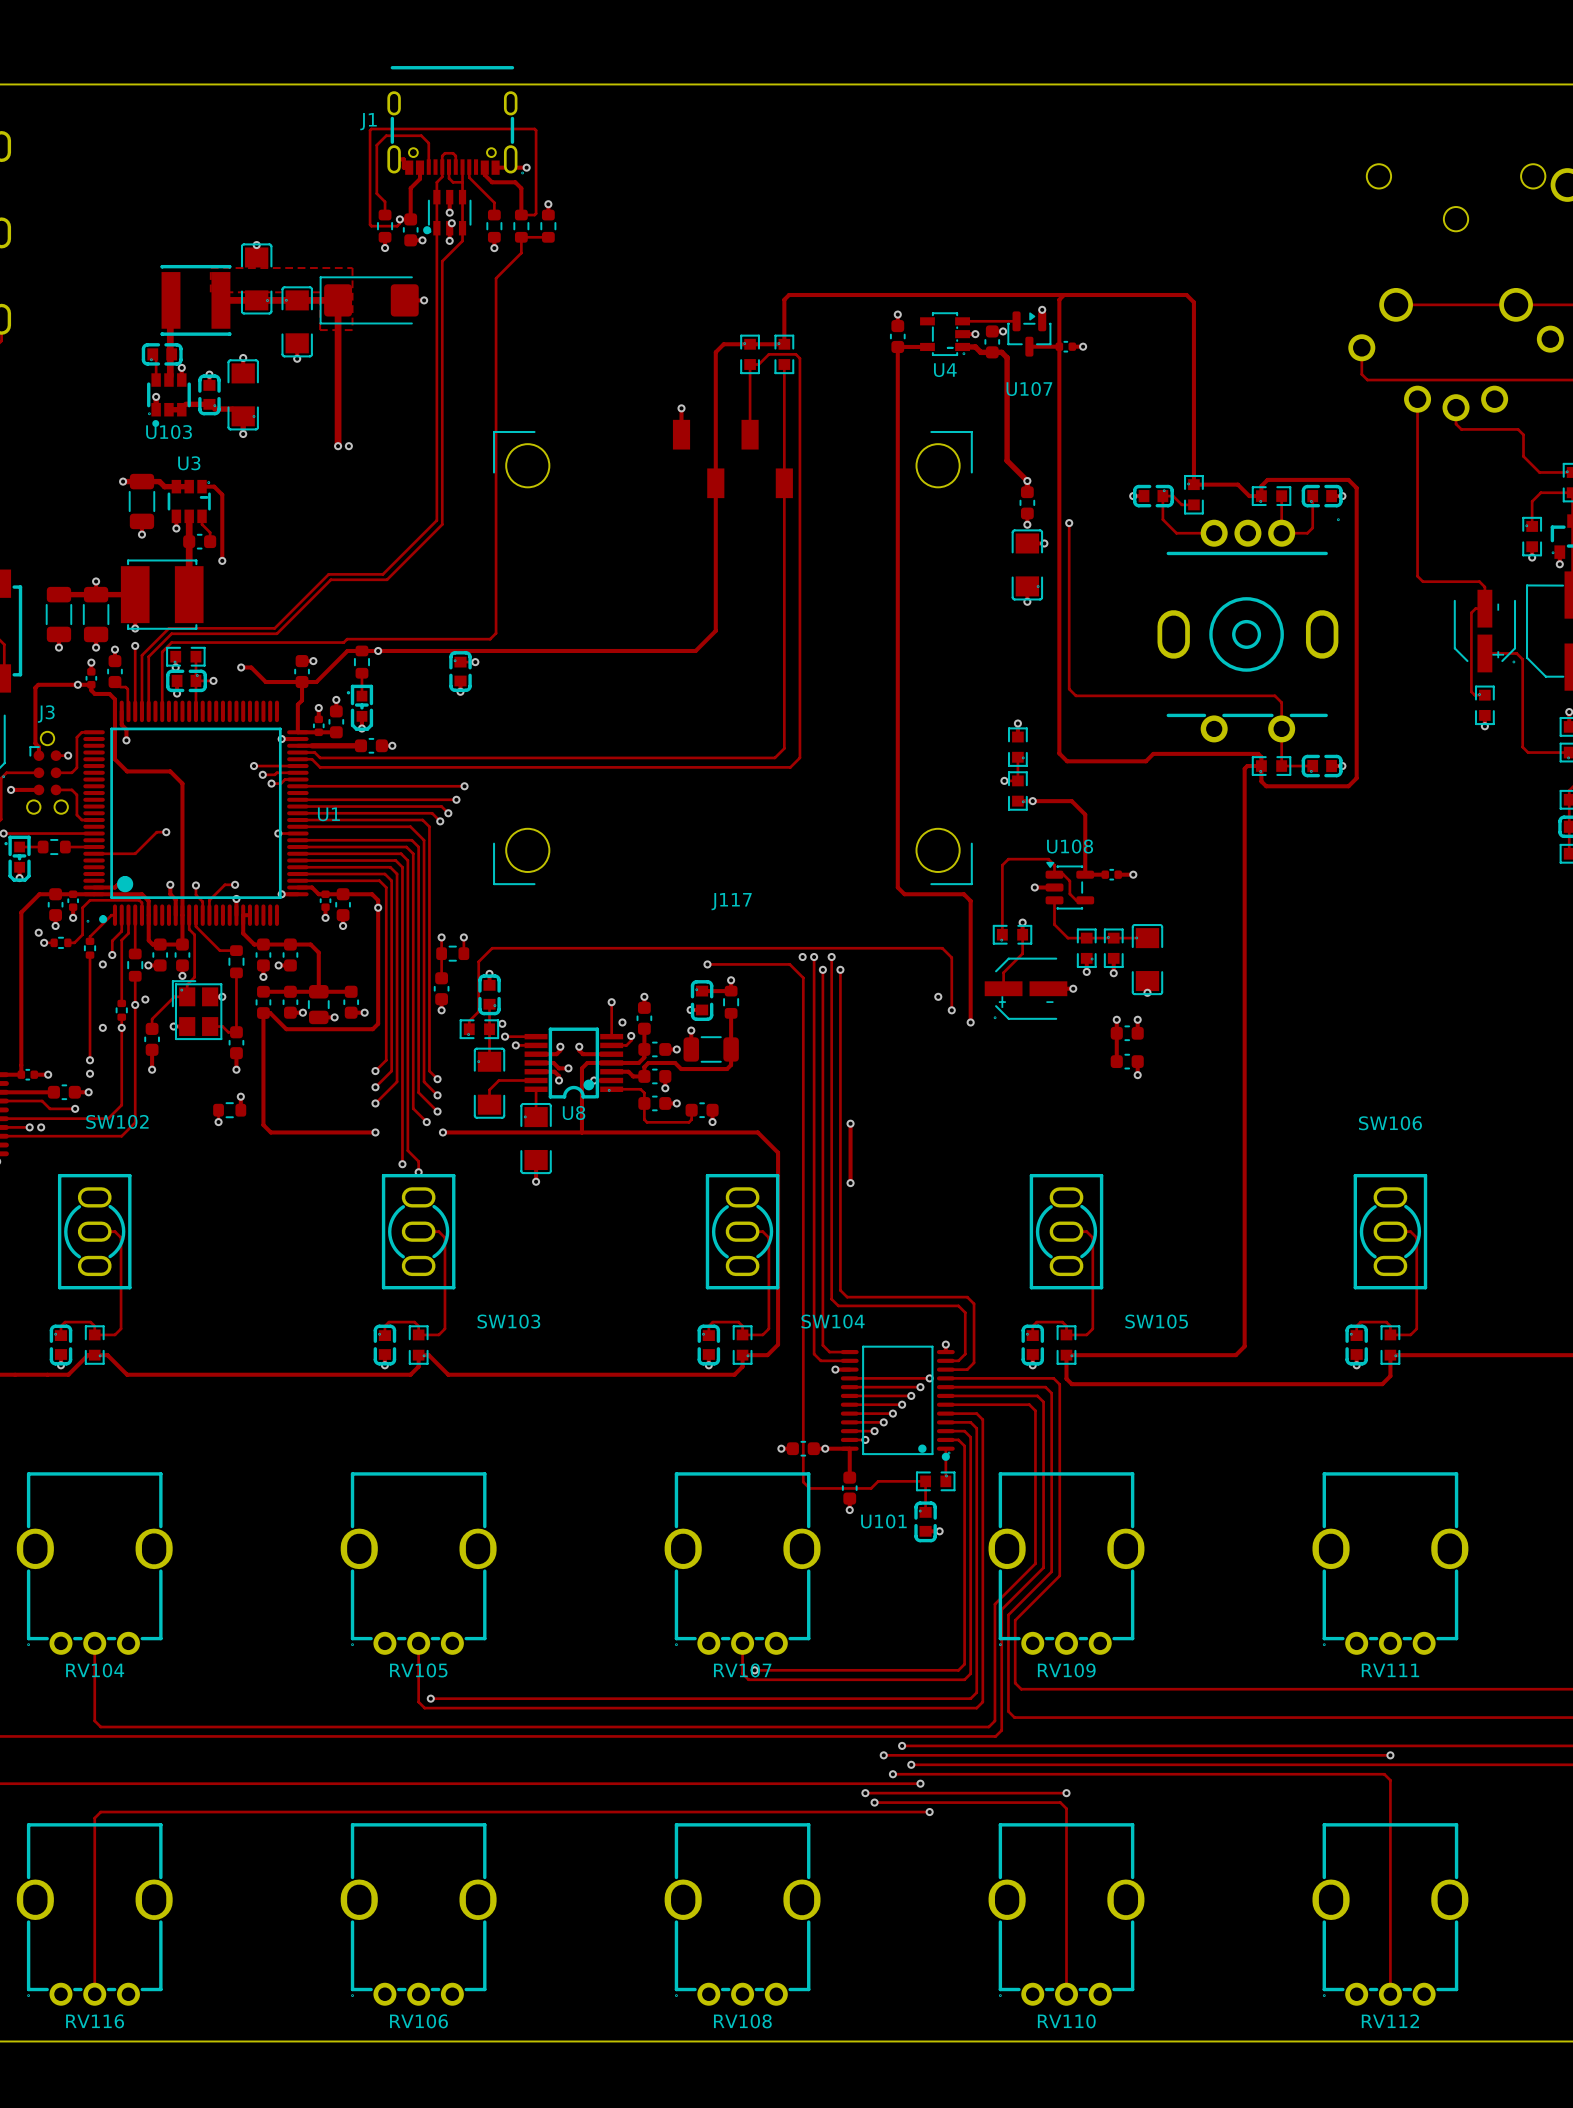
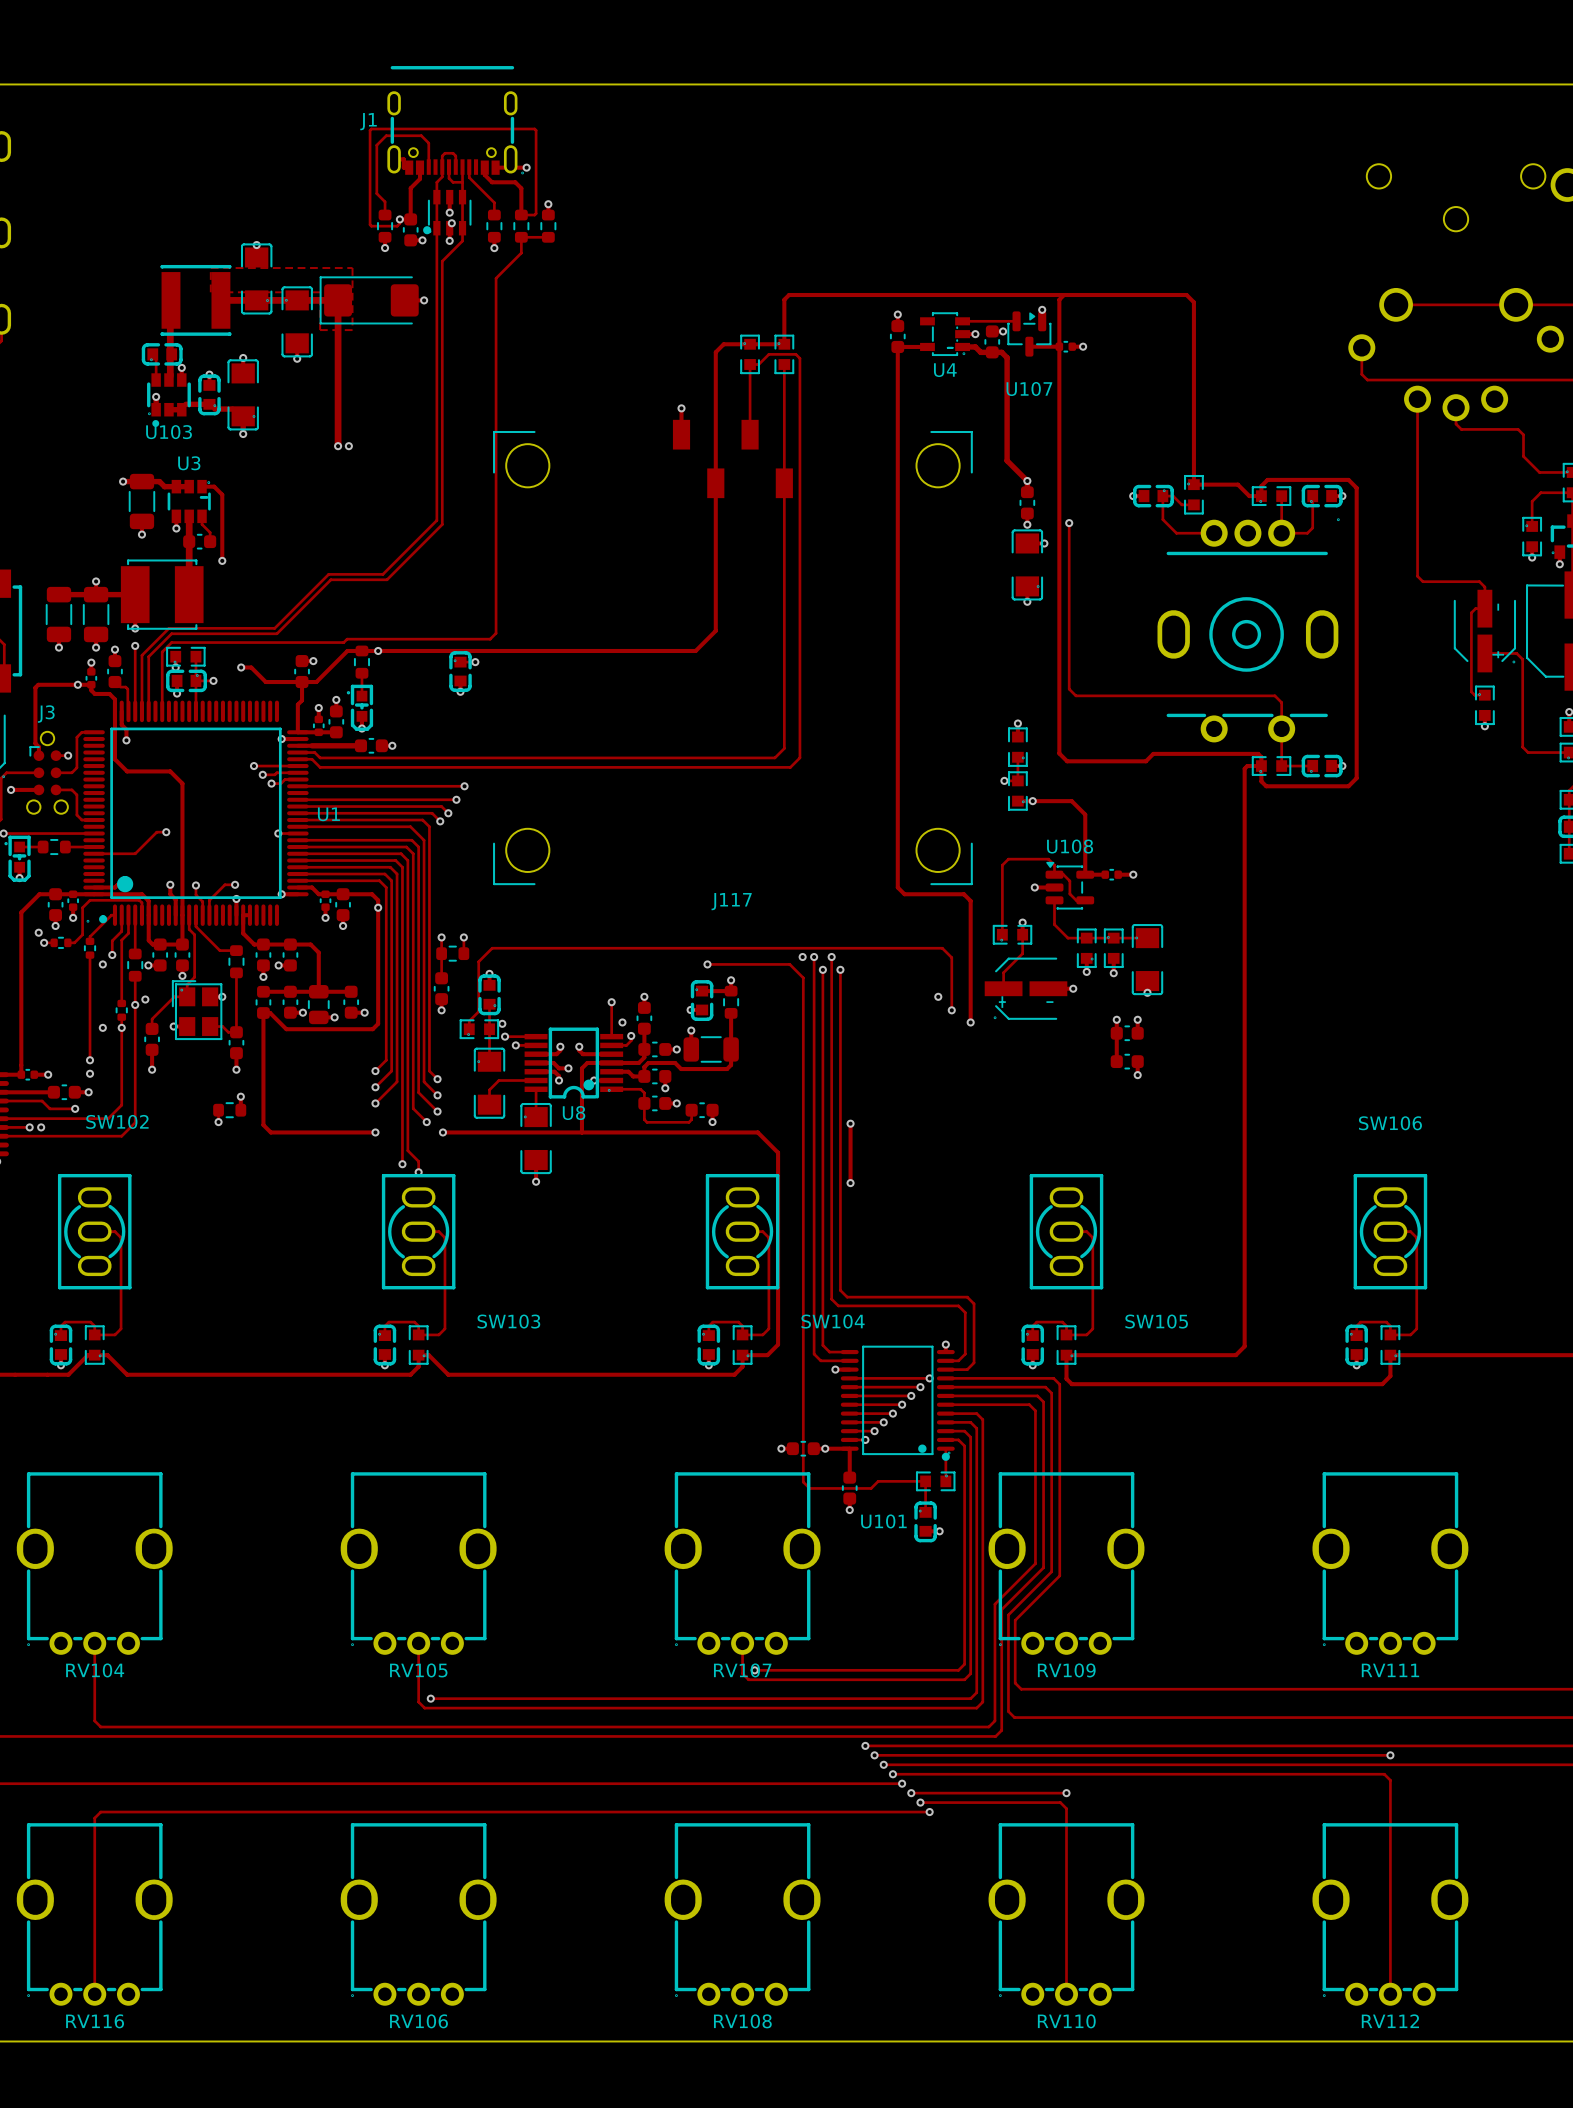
track: none -> (865, 1745) (902, 1745)
via: none -> (865, 1745)
via: (902, 1745) -> none
track: none -> (874, 1755) (883, 1755)
via: none -> (874, 1755)
via: (883, 1755) -> none
track: none -> (883, 1764) (911, 1764)
via: none -> (883, 1764)
via: (911, 1764) -> none
track: (902, 1783) (920, 1783) -> none
via: none -> (902, 1783)
via: (920, 1783) -> none
track: (865, 1793) (911, 1793) -> none
via: (865, 1793) -> none
via: none -> (911, 1793)
track: (874, 1802) (920, 1802) -> none
via: (874, 1802) -> none
via: none -> (920, 1802)

